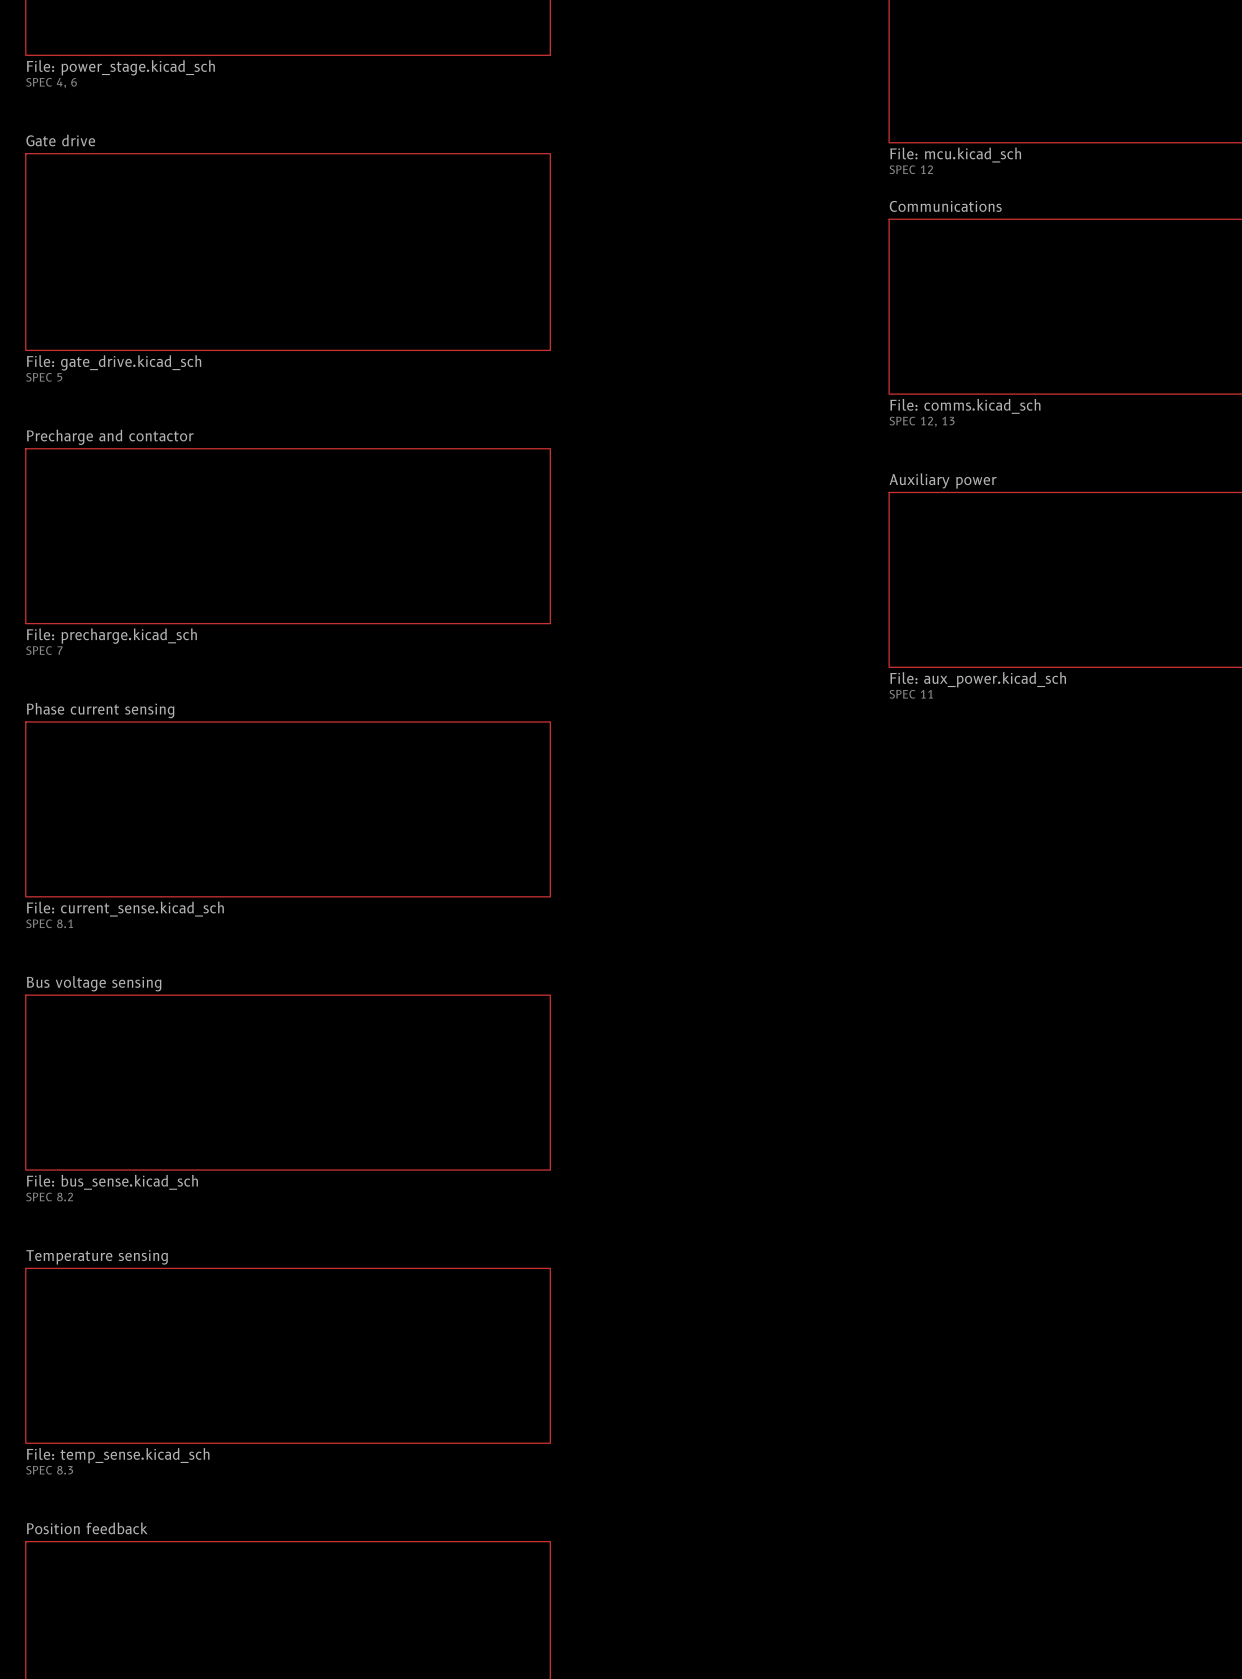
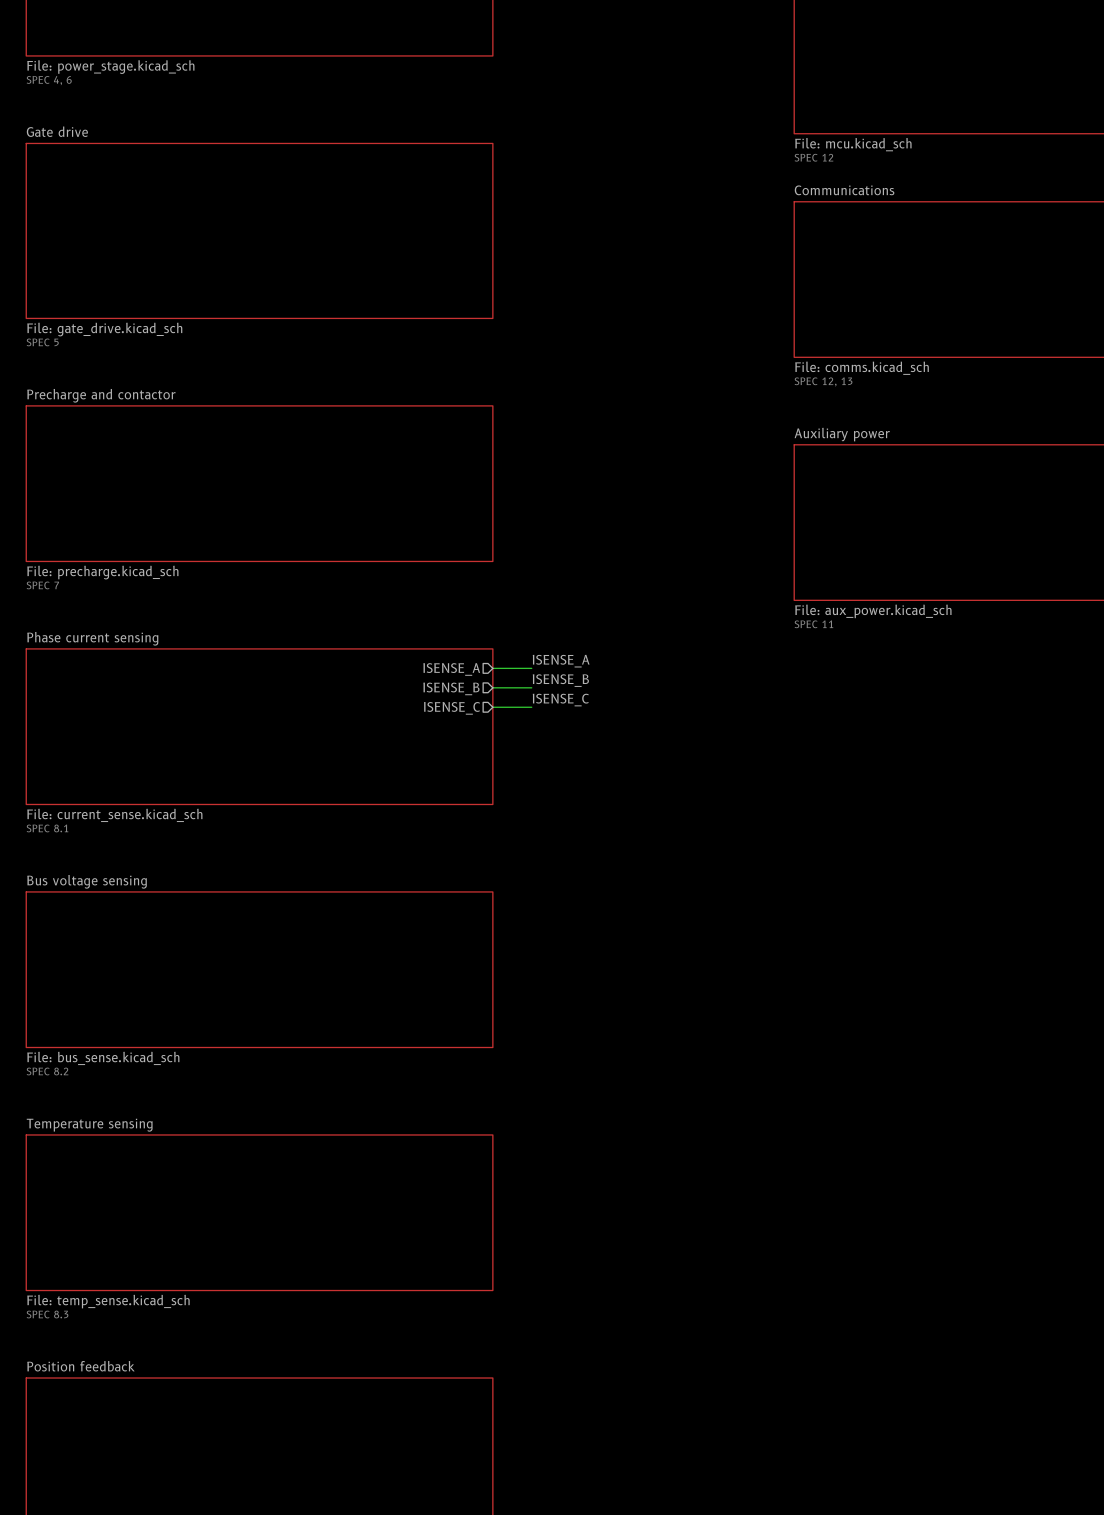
label: none -> ISENSE_A (561, 661)
wire: none -> (492, 668) (531, 668)
sheet pin: none -> ISENSE_A (451, 669)
label: none -> ISENSE_B (560, 680)
wire: none -> (492, 687) (531, 687)
sheet pin: none -> ISENSE_B (451, 688)
label: none -> ISENSE_C (560, 700)
wire: none -> (492, 707) (531, 707)
sheet pin: none -> ISENSE_C (452, 708)

